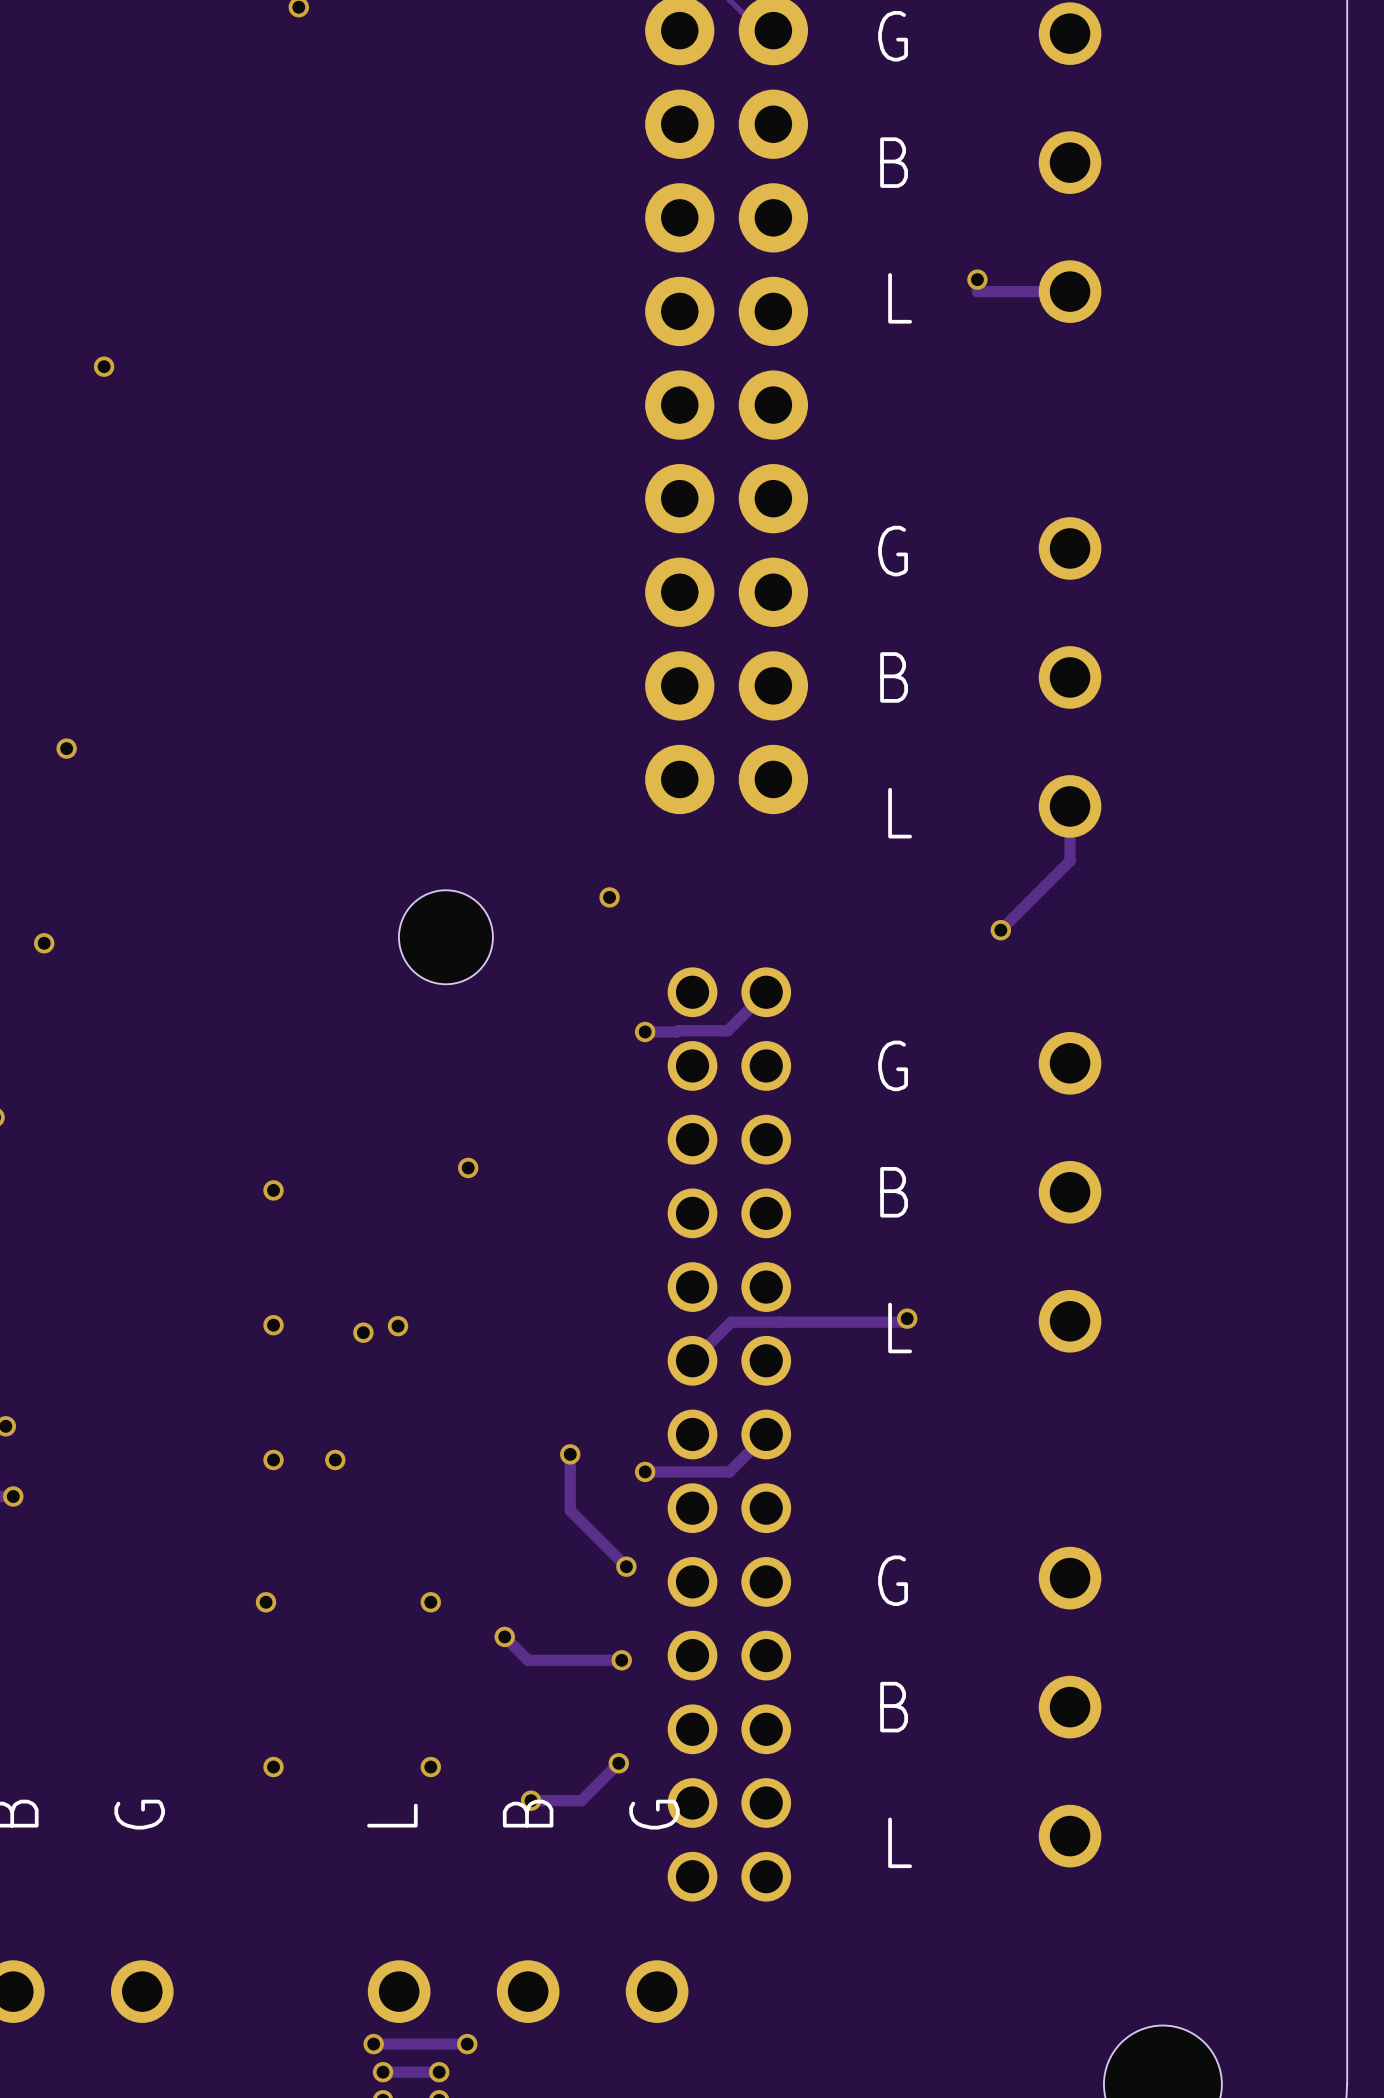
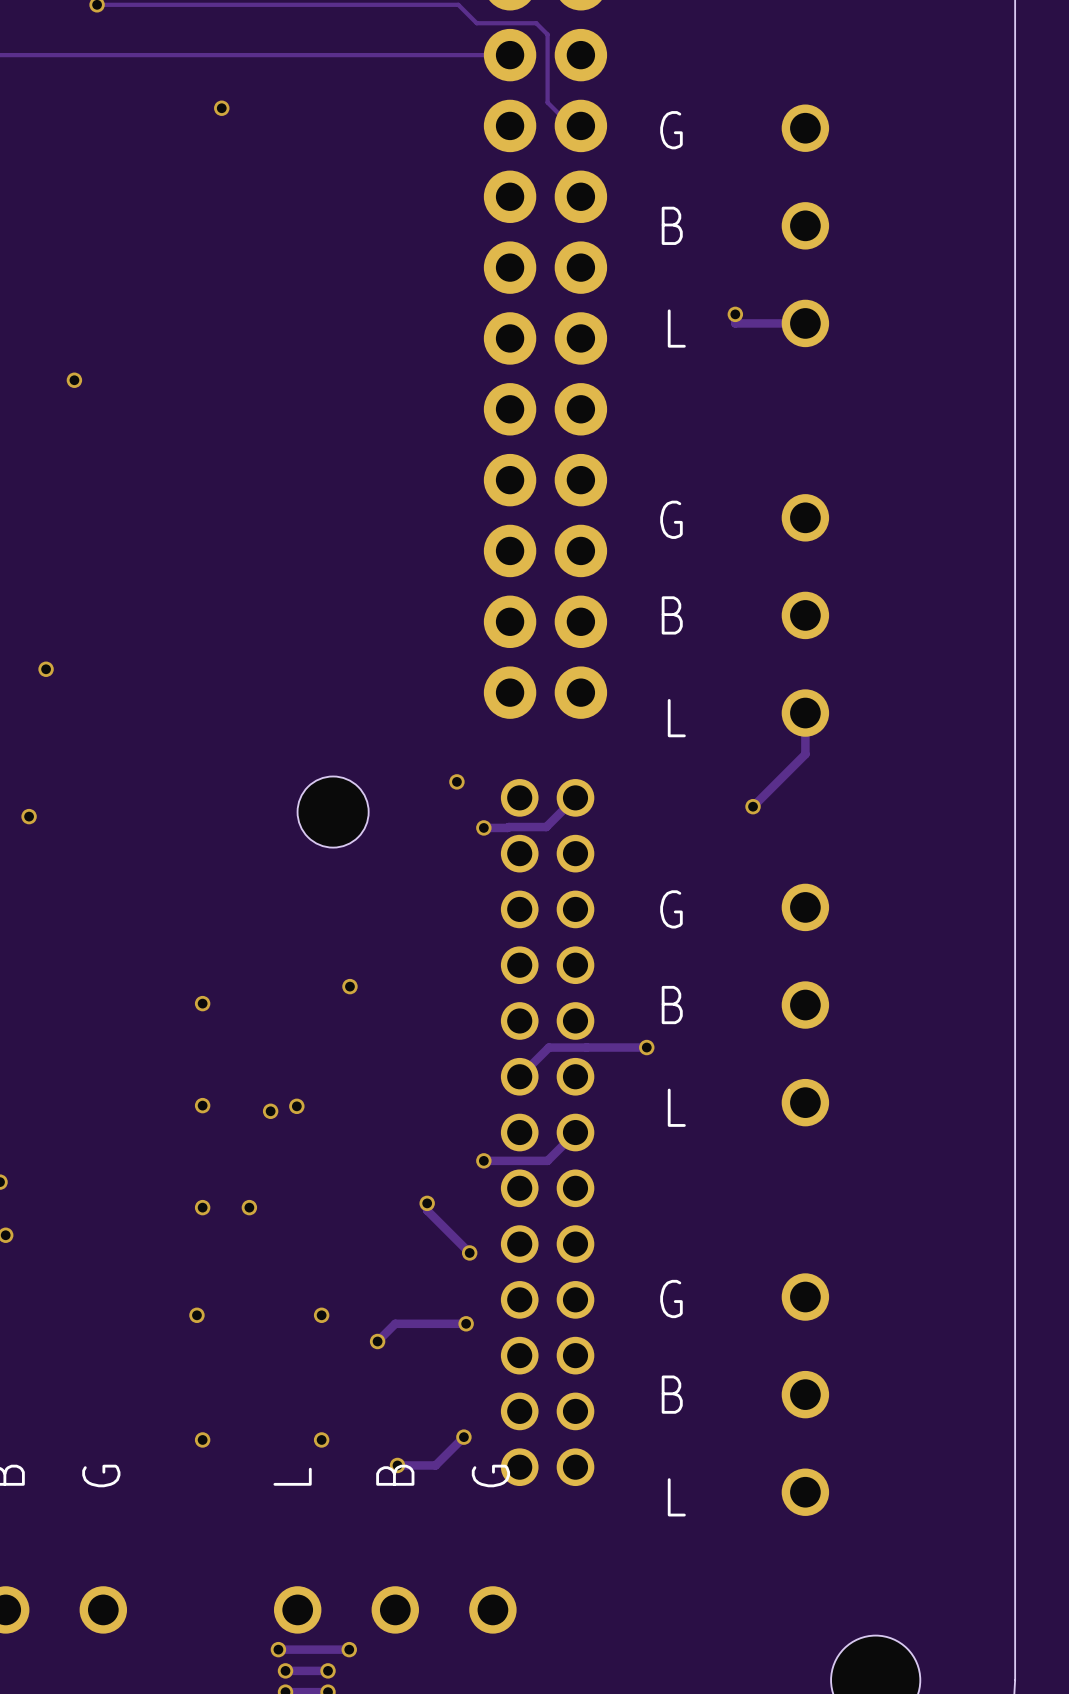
track: (766, 992) (727, 1030) (645, 1031) -> (575, 797) (546, 827) (483, 827)
via position: (645, 1031) -> (483, 827)
track: none -> (646, 1047) (586, 1047)
track: (907, 1318) (903, 1322) (780, 1322) -> none
via position: (907, 1318) -> (646, 1047)
track: (780, 1322) (731, 1322) (692, 1360) -> (586, 1047) (548, 1047) (519, 1076)
via: none -> (483, 1160)
part position: (729, 1434) -> (547, 1132)
track: (766, 1435) (729, 1471) (645, 1471) -> (575, 1132) (547, 1160) (483, 1160)
track: (570, 1463) (570, 1510) (626, 1566) -> (427, 1210) (469, 1252)
via: (645, 1471) -> none
via: none -> (469, 1252)
via: (626, 1566) -> none
via: none -> (466, 1323)
track: (504, 1636) (528, 1660) (621, 1660) -> (377, 1341) (395, 1323) (466, 1323)
via: (621, 1660) -> none

